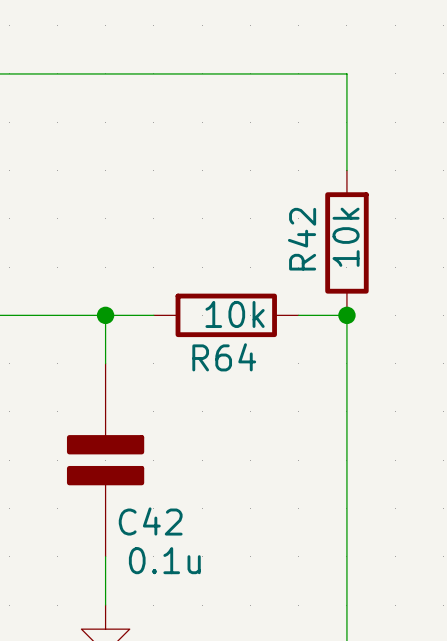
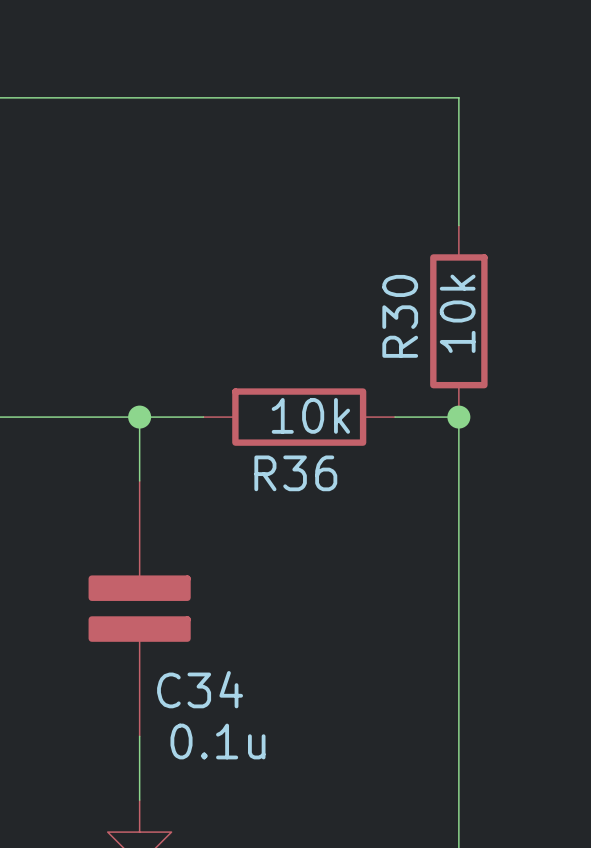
R42 name: R42 (302, 239) -> R30 (400, 316)
R64 name: R64 (224, 357) -> R36 (295, 473)
C42 name: C42 (150, 521) -> C34 (200, 689)

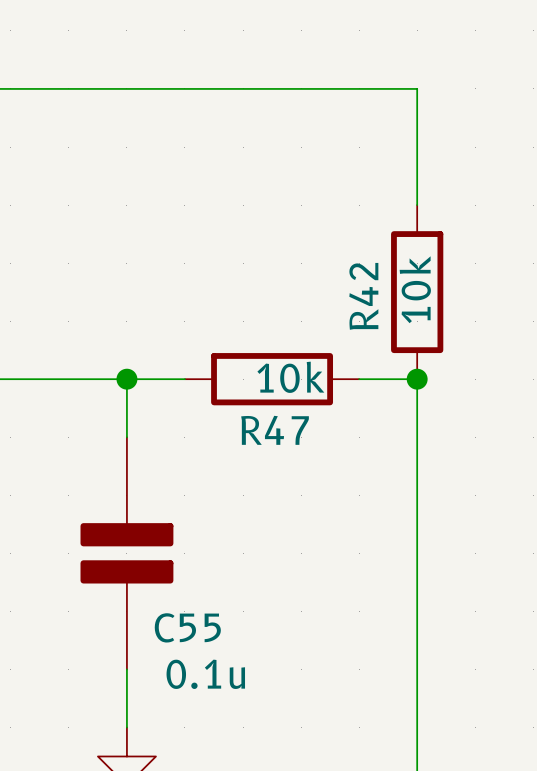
R30 name: R30 (400, 316) -> R42 (363, 296)
R36 name: R36 (295, 473) -> R47 (275, 430)
C34 name: C34 (200, 689) -> C55 (187, 627)

